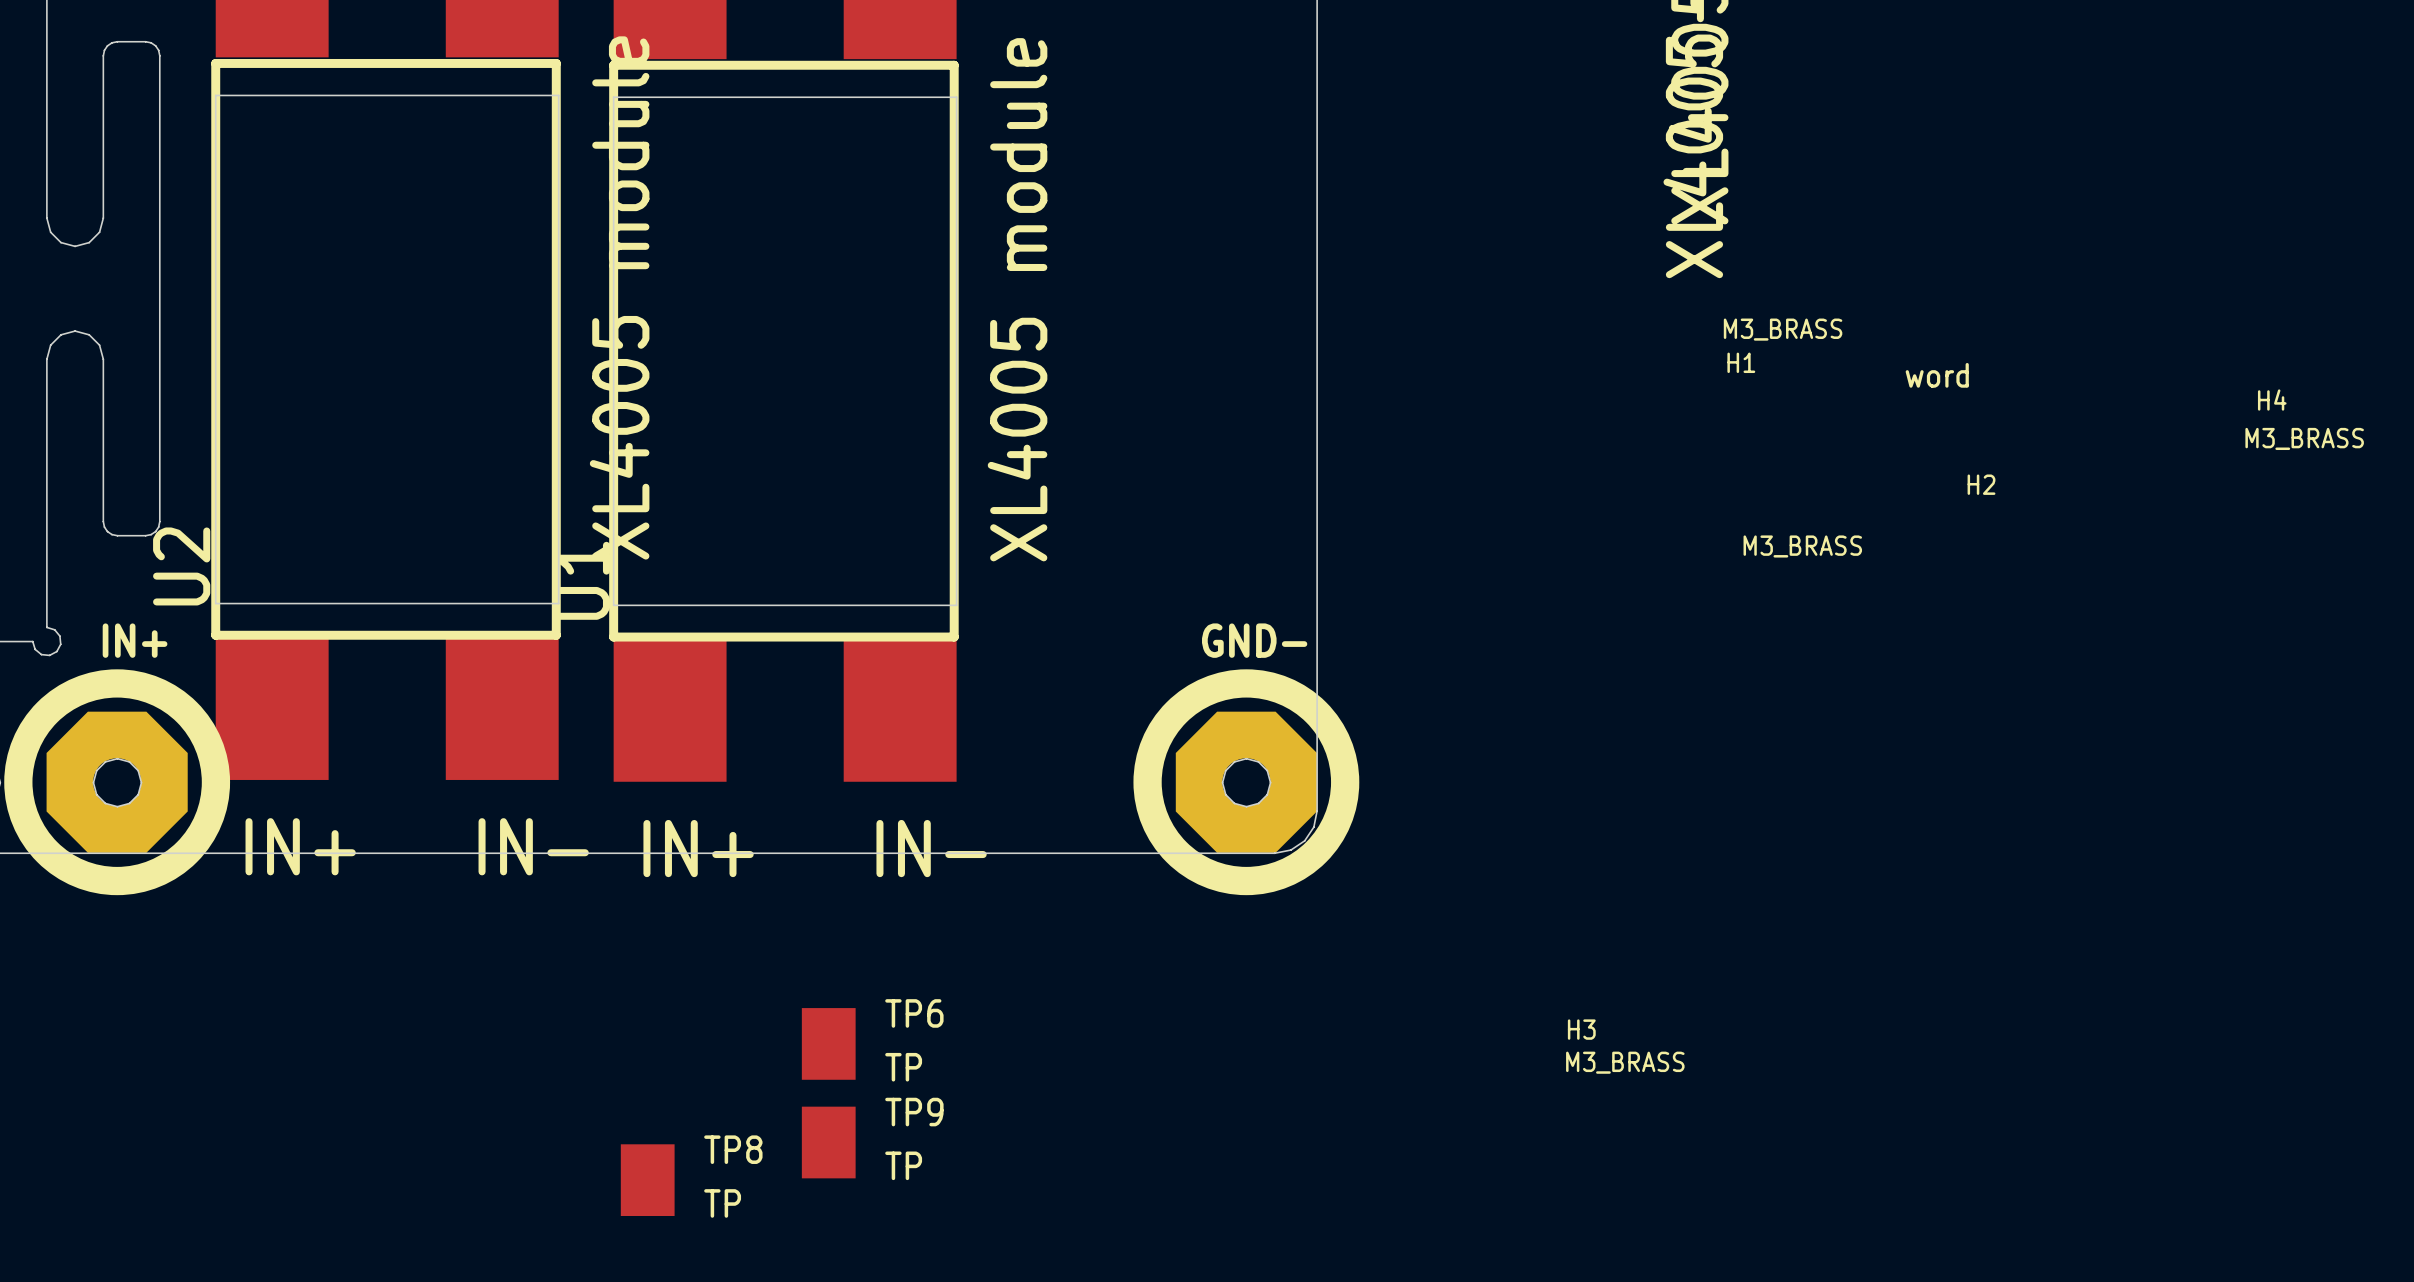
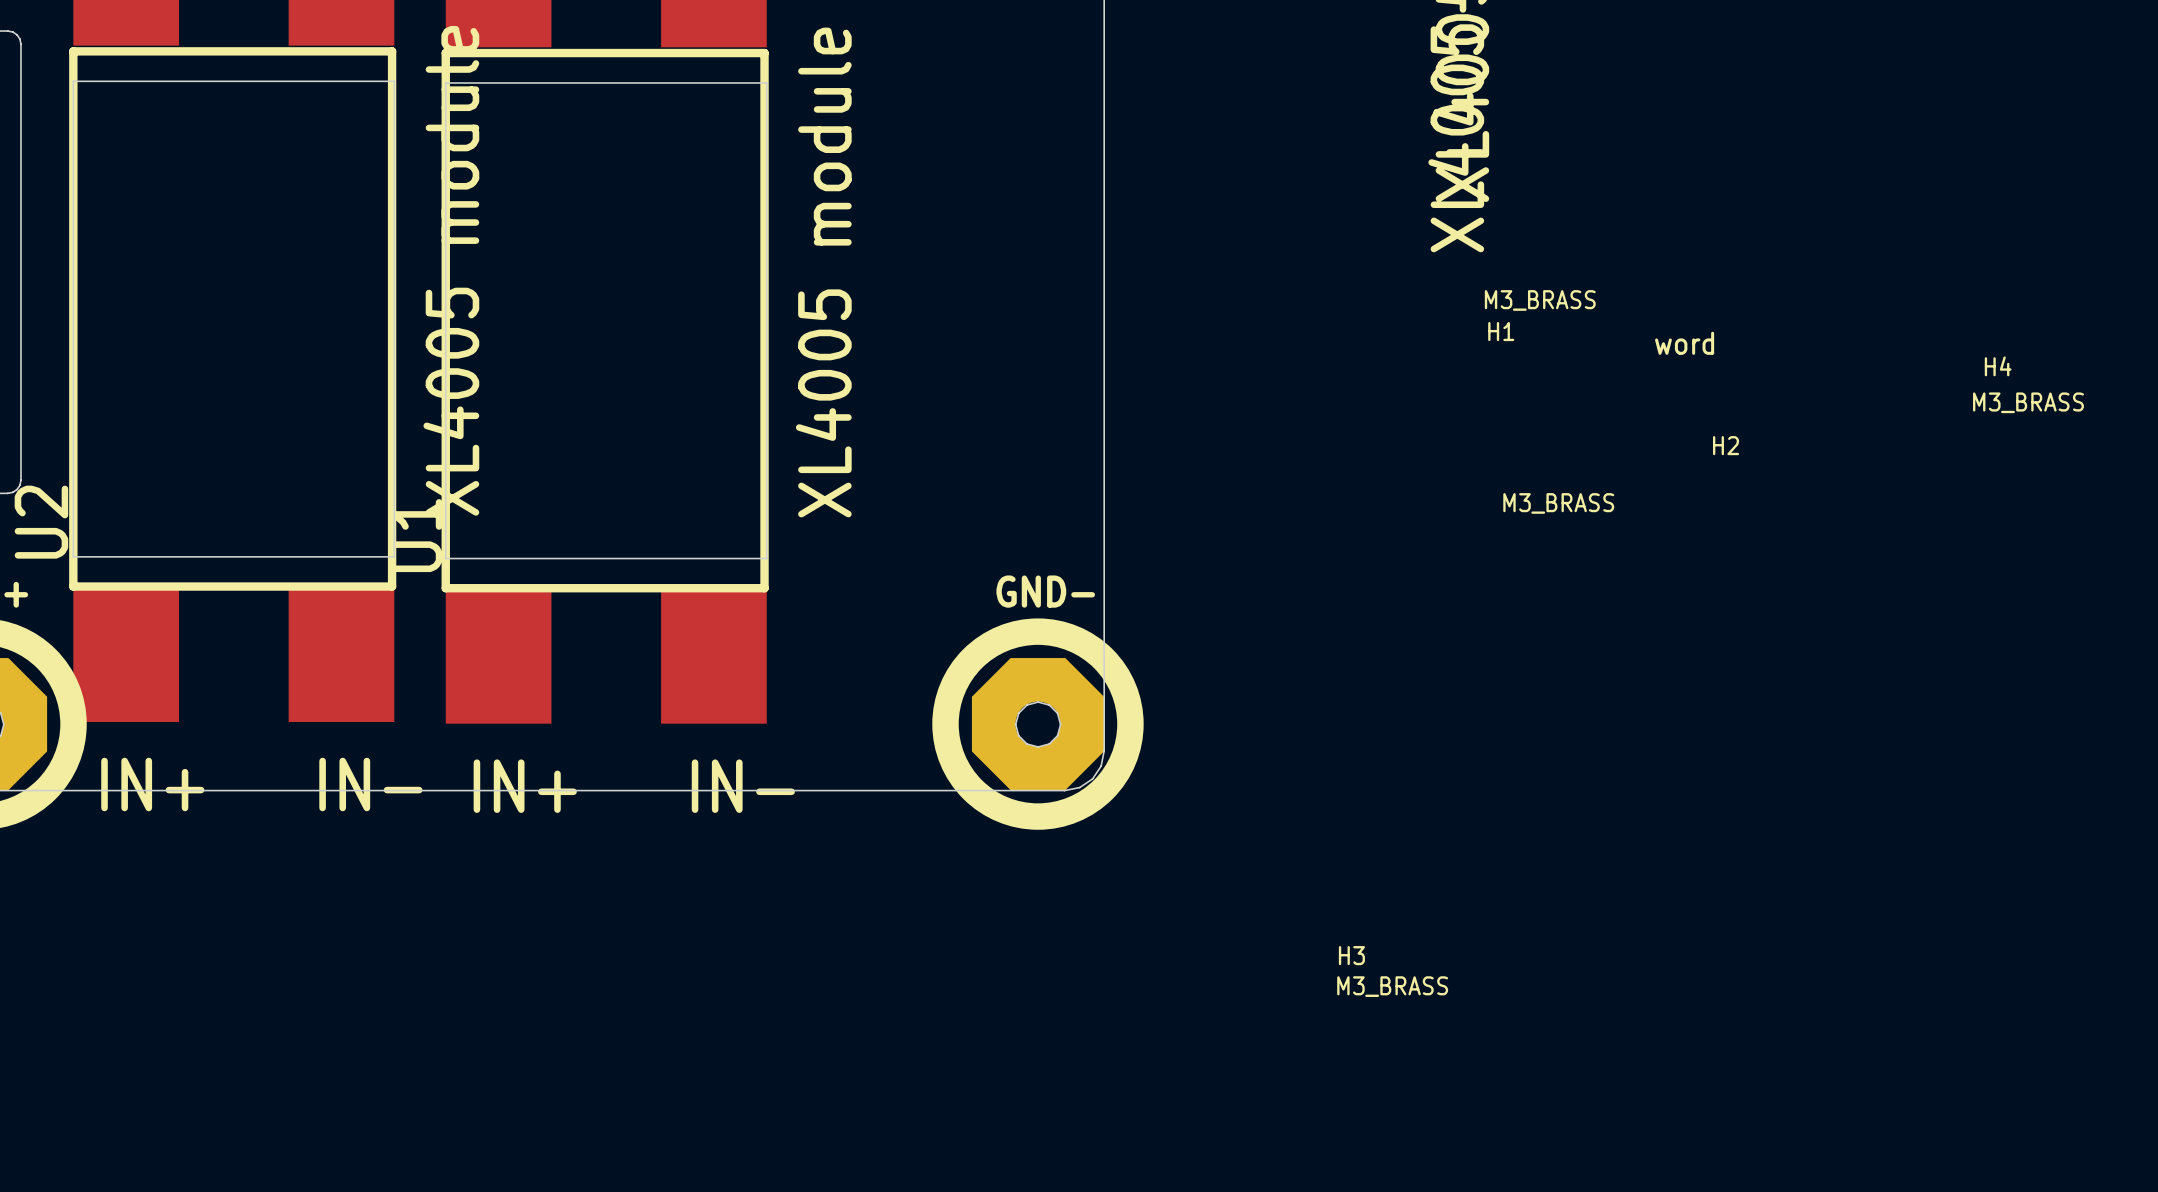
TP6: TP (828, 1043) -> none
TP9: TP (828, 1142) -> none
TP8: TP (647, 1180) -> none

